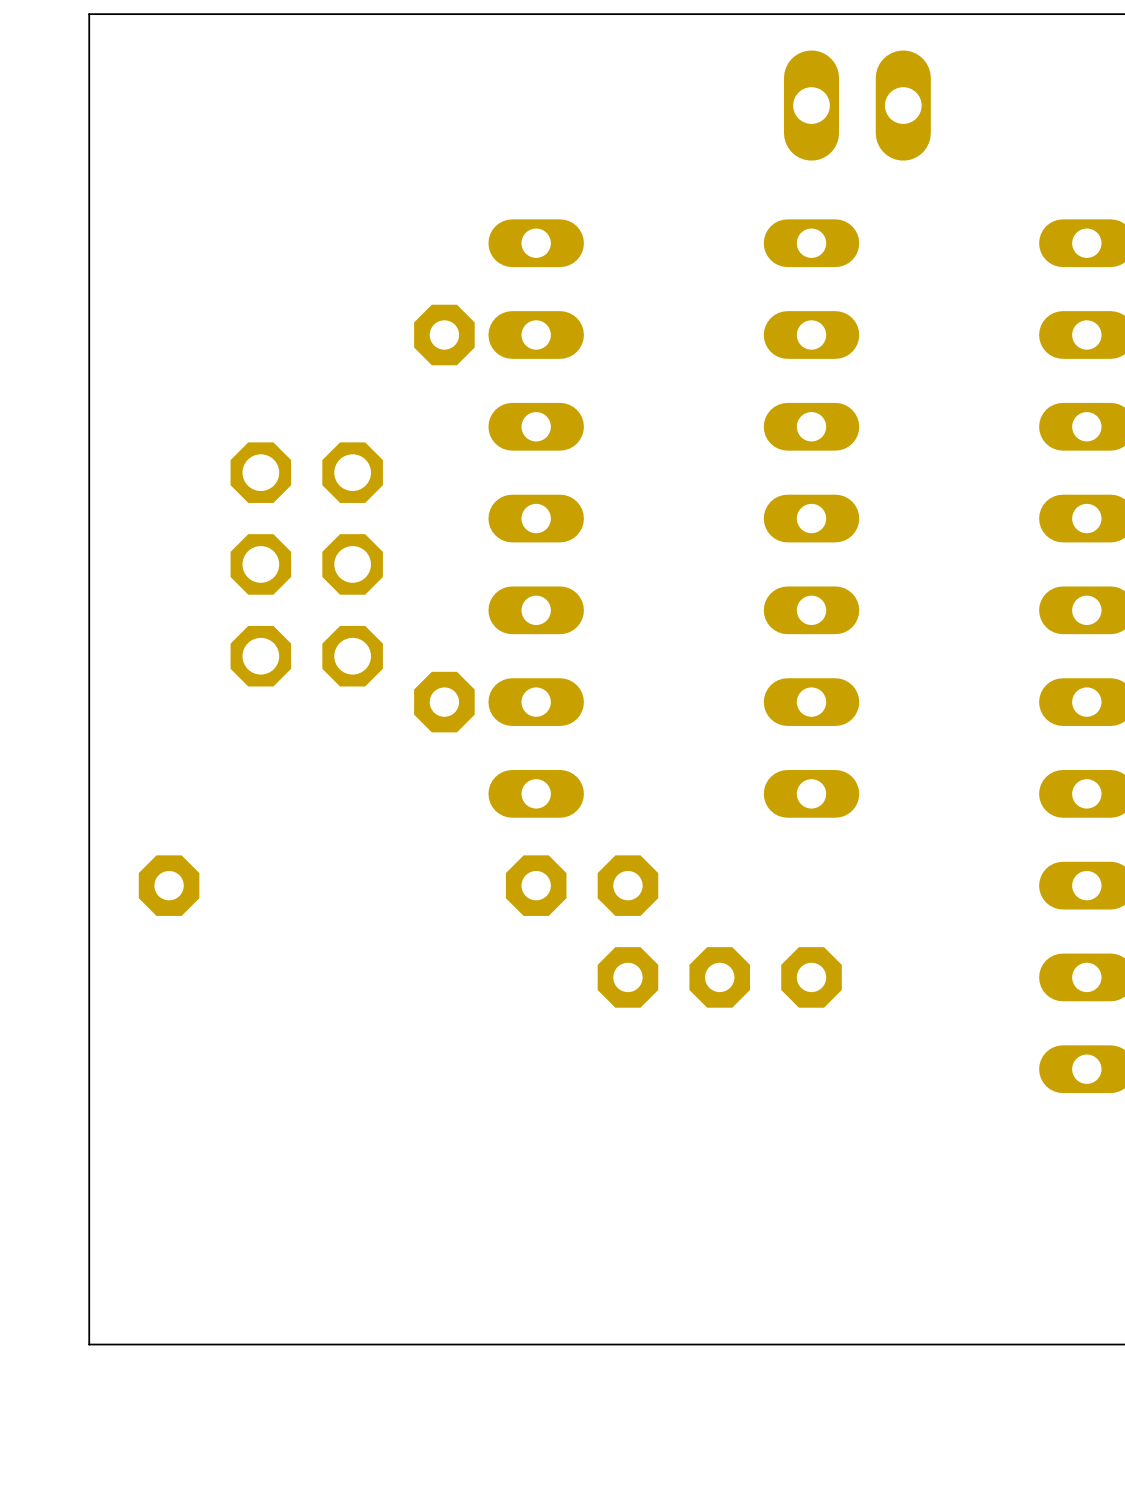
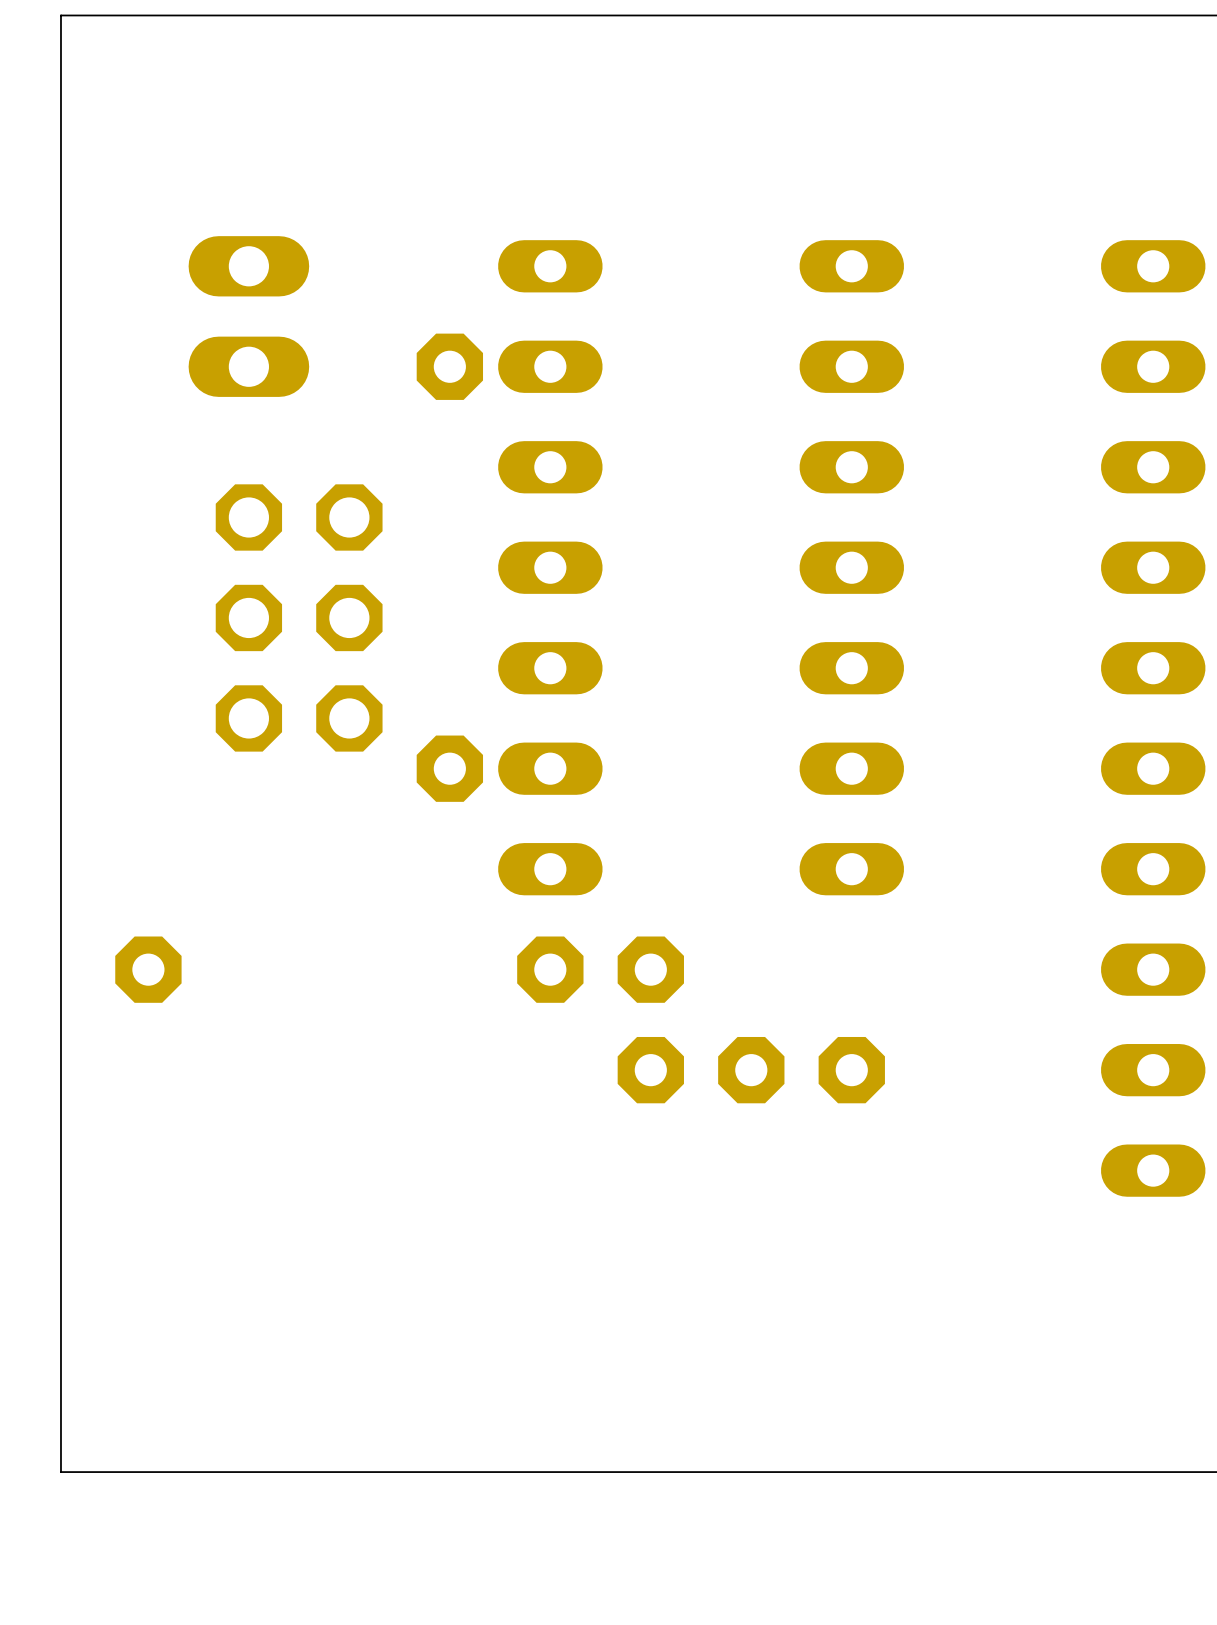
part rotation: 0° (857, 105) -> 90° clockwise (248, 316)
part position: (857, 105) -> (248, 316)

